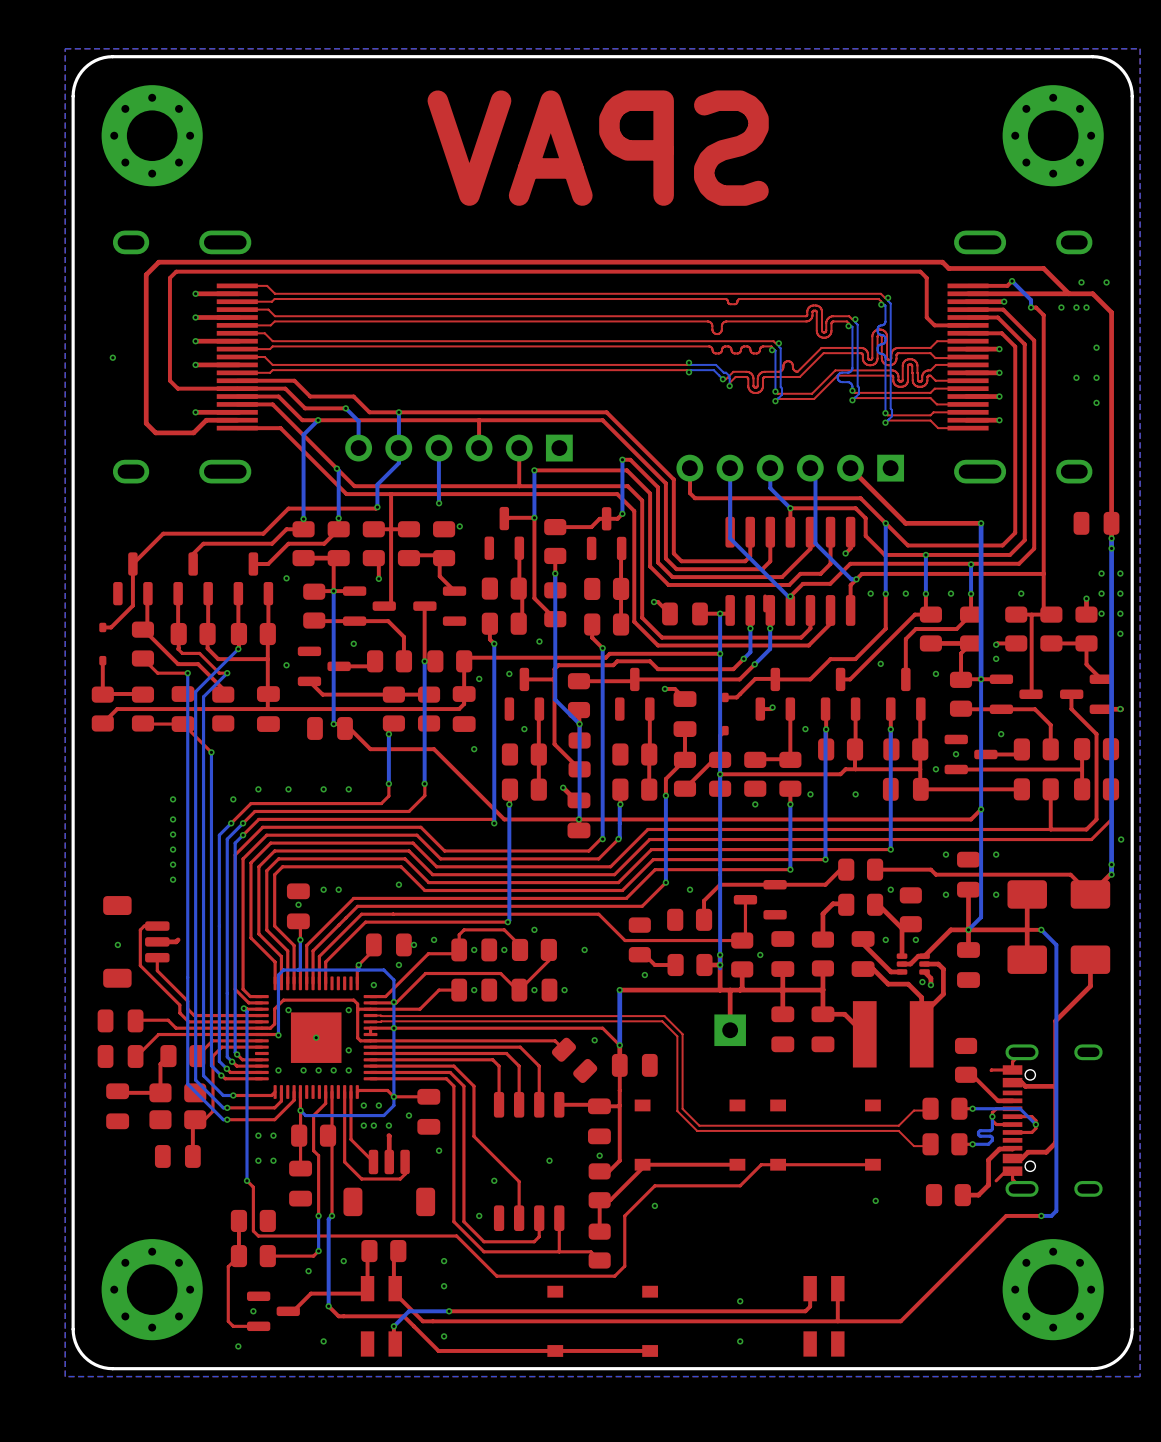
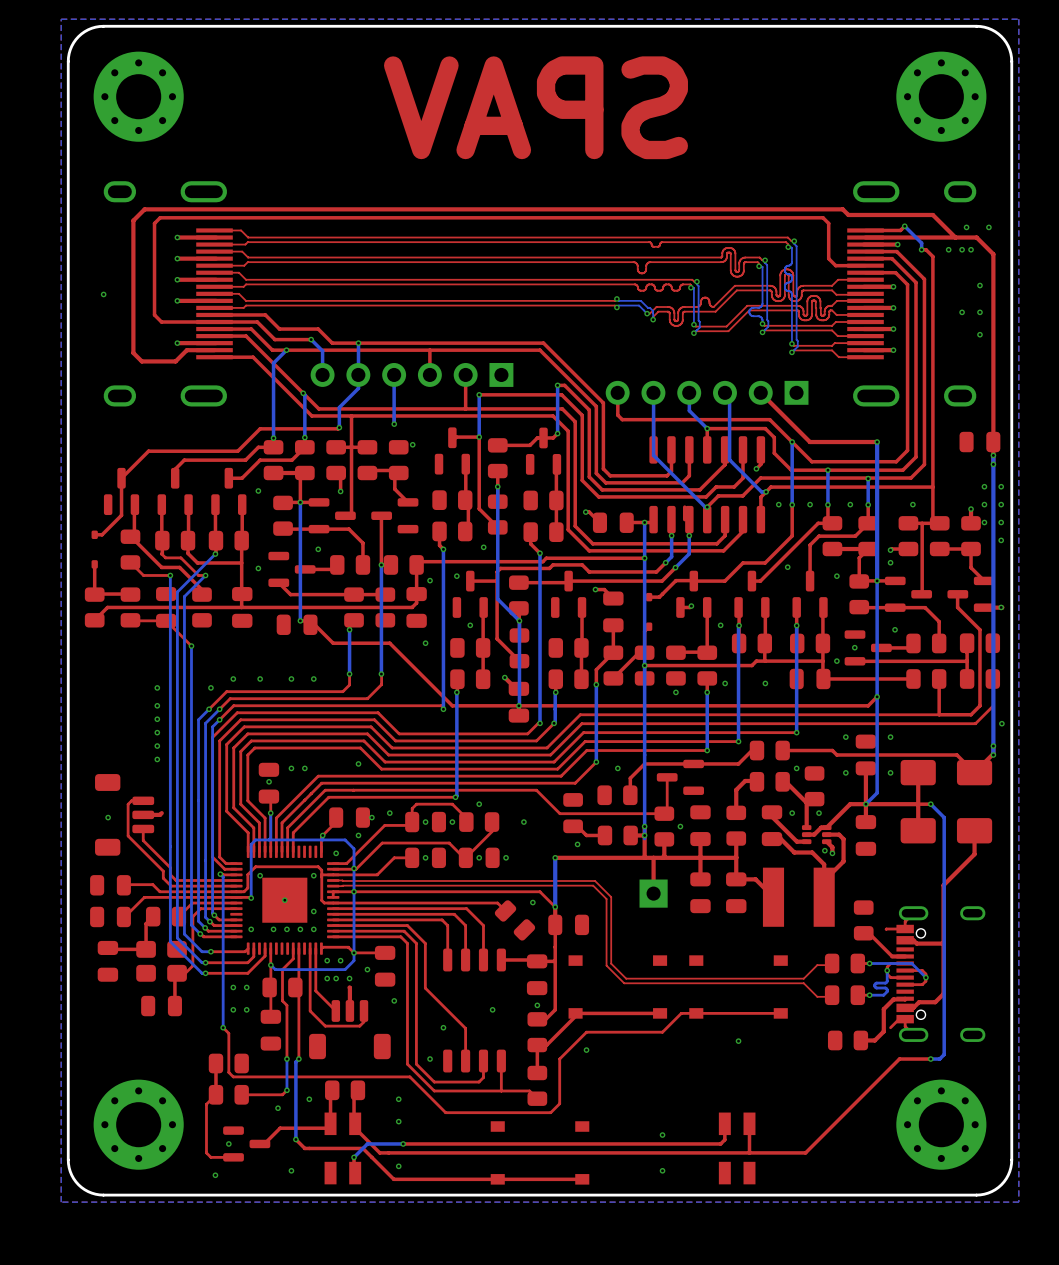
via position: (875, 1200) -> (738, 1041)

